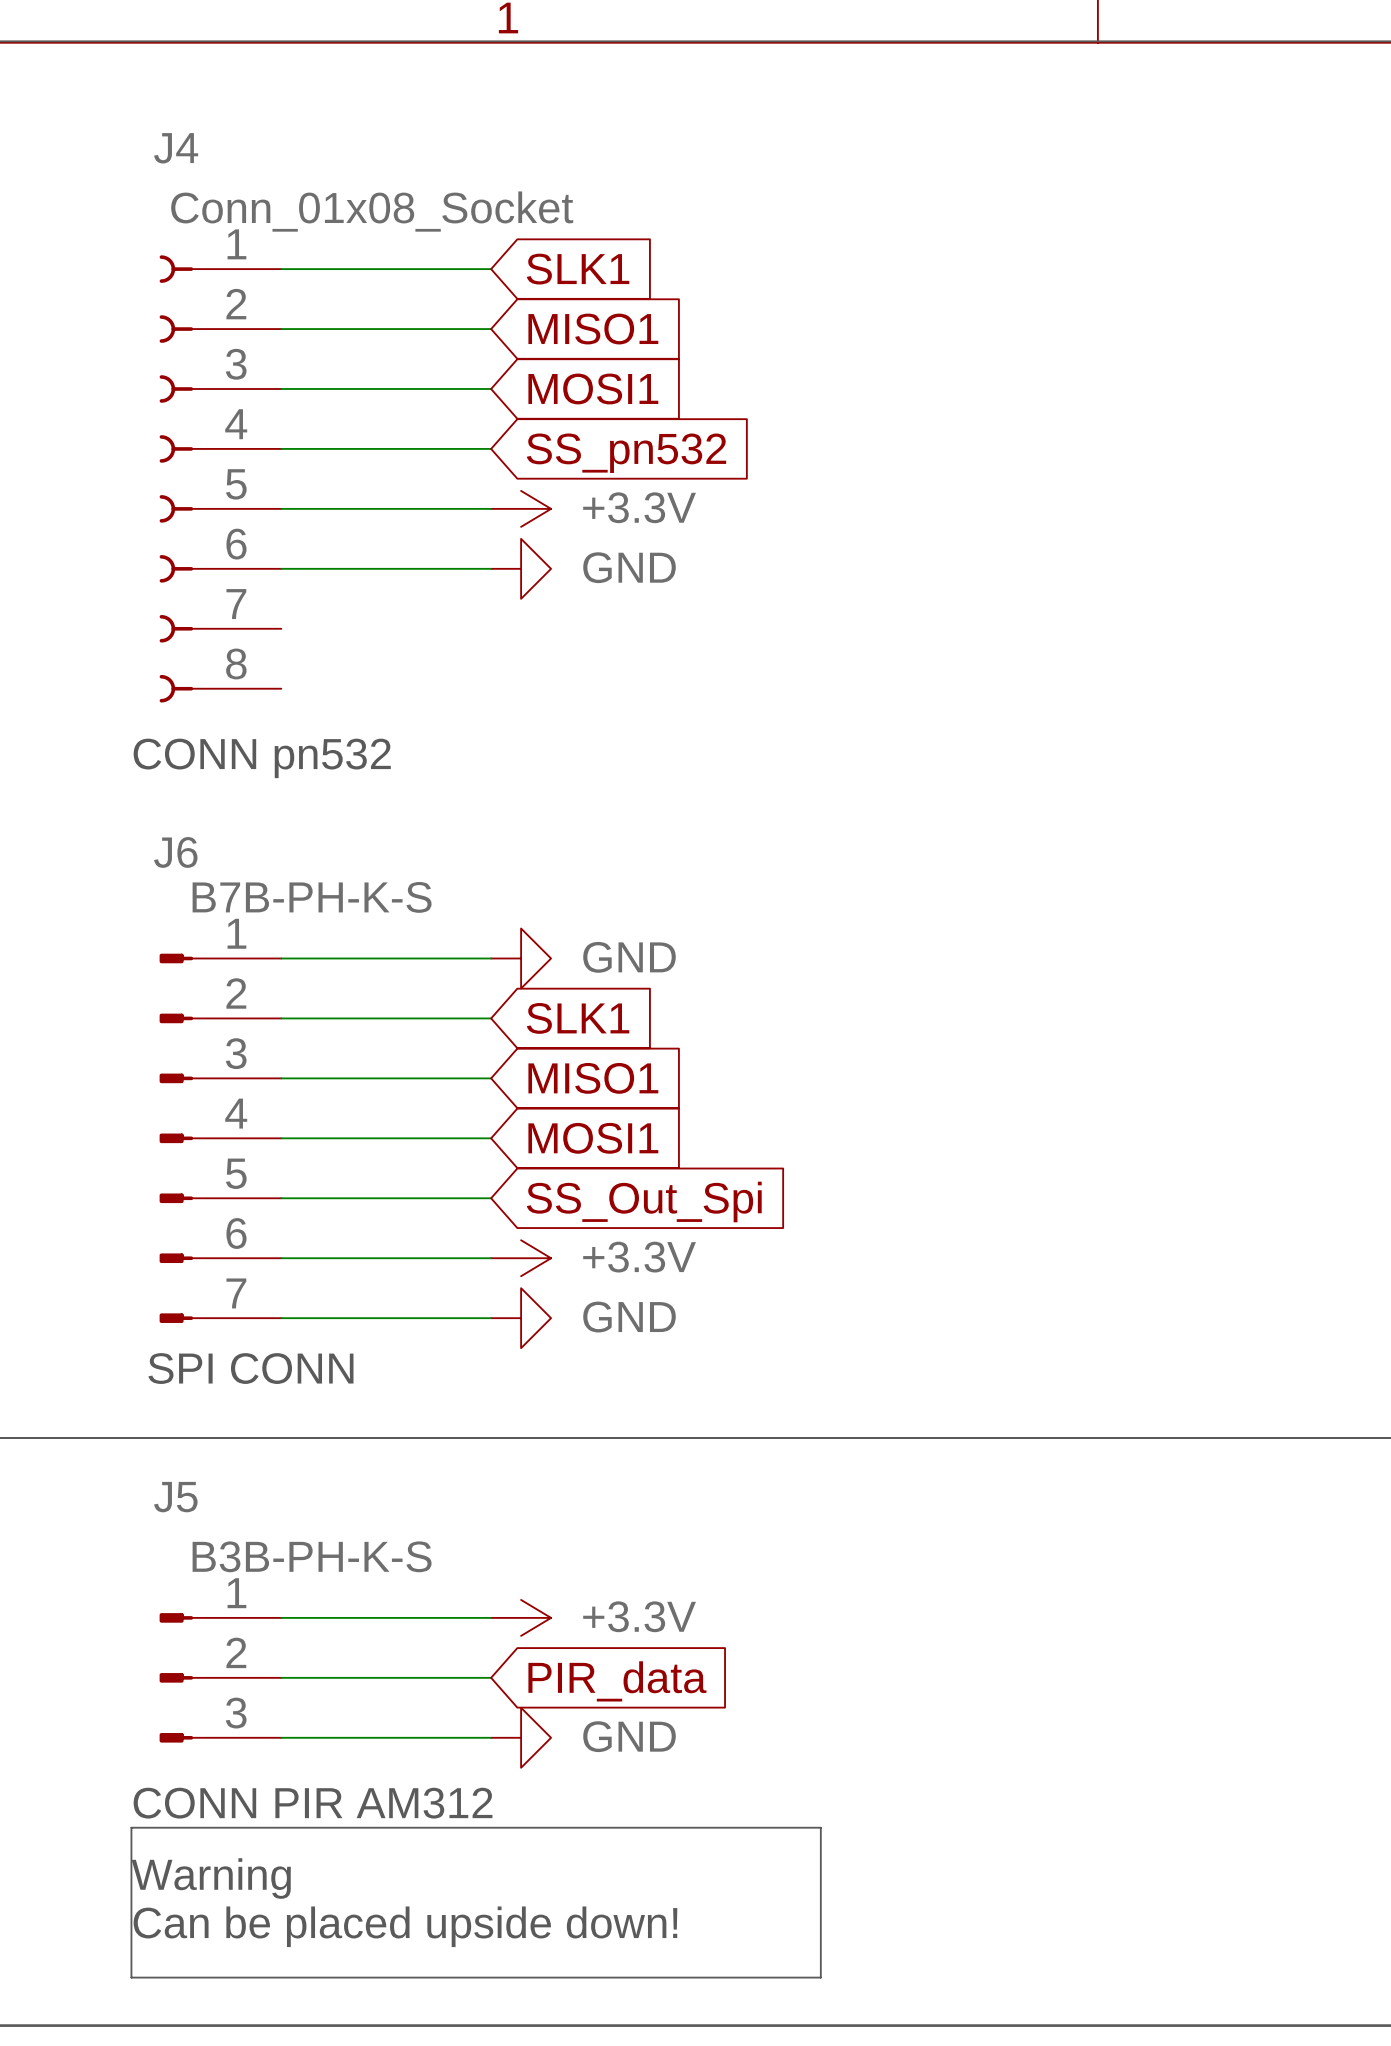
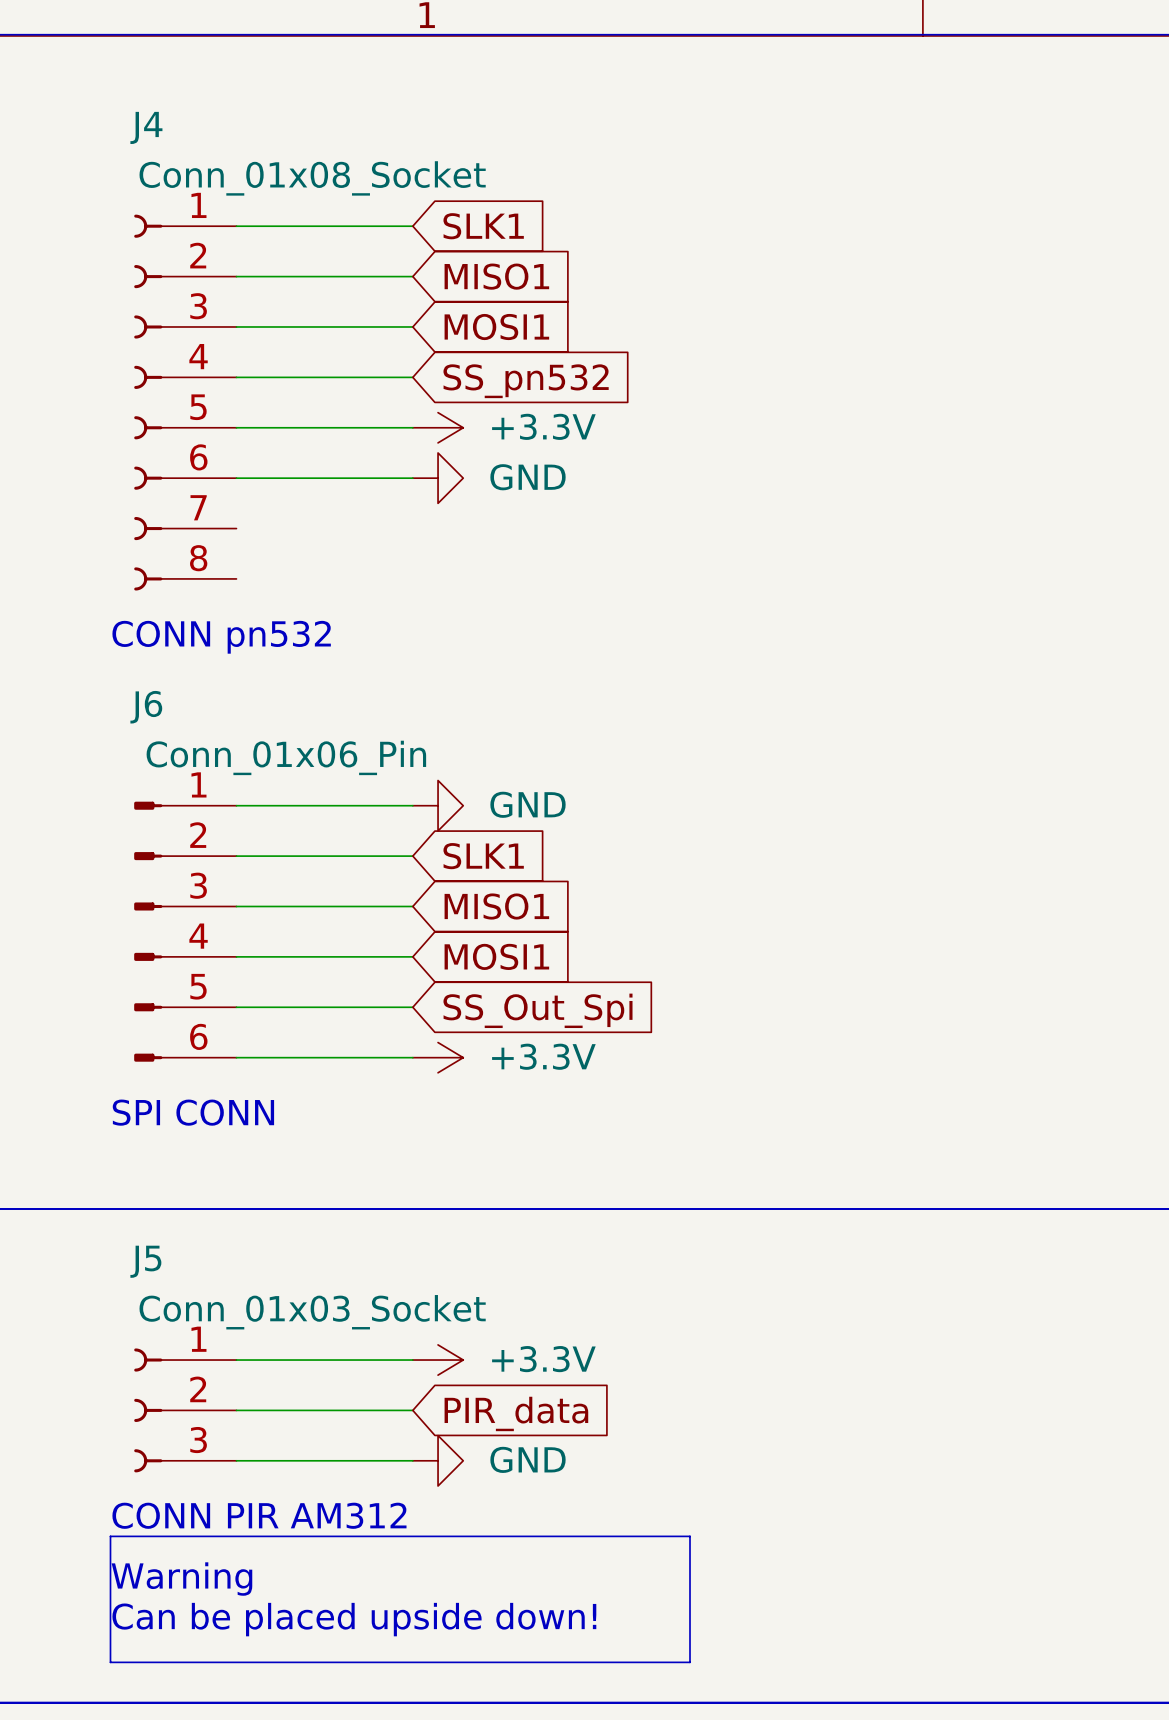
J6 value: B7B-PH-K-S (312, 897) -> Conn_01x06_Pin (286, 757)
J6 symbol: [159, 953, 282, 1323] -> [134, 801, 237, 1062]
wire: (281, 1318) (491, 1318) -> none
power symbol: GND (521, 1318) -> none
text position: SPI CONN (250, 1368) -> SPI CONN (193, 1112)
J5 value: B3B-PH-K-S (312, 1556) -> Conn_01x03_Socket (312, 1312)
J5 symbol: [159, 1613, 282, 1743] -> [134, 1348, 237, 1473]

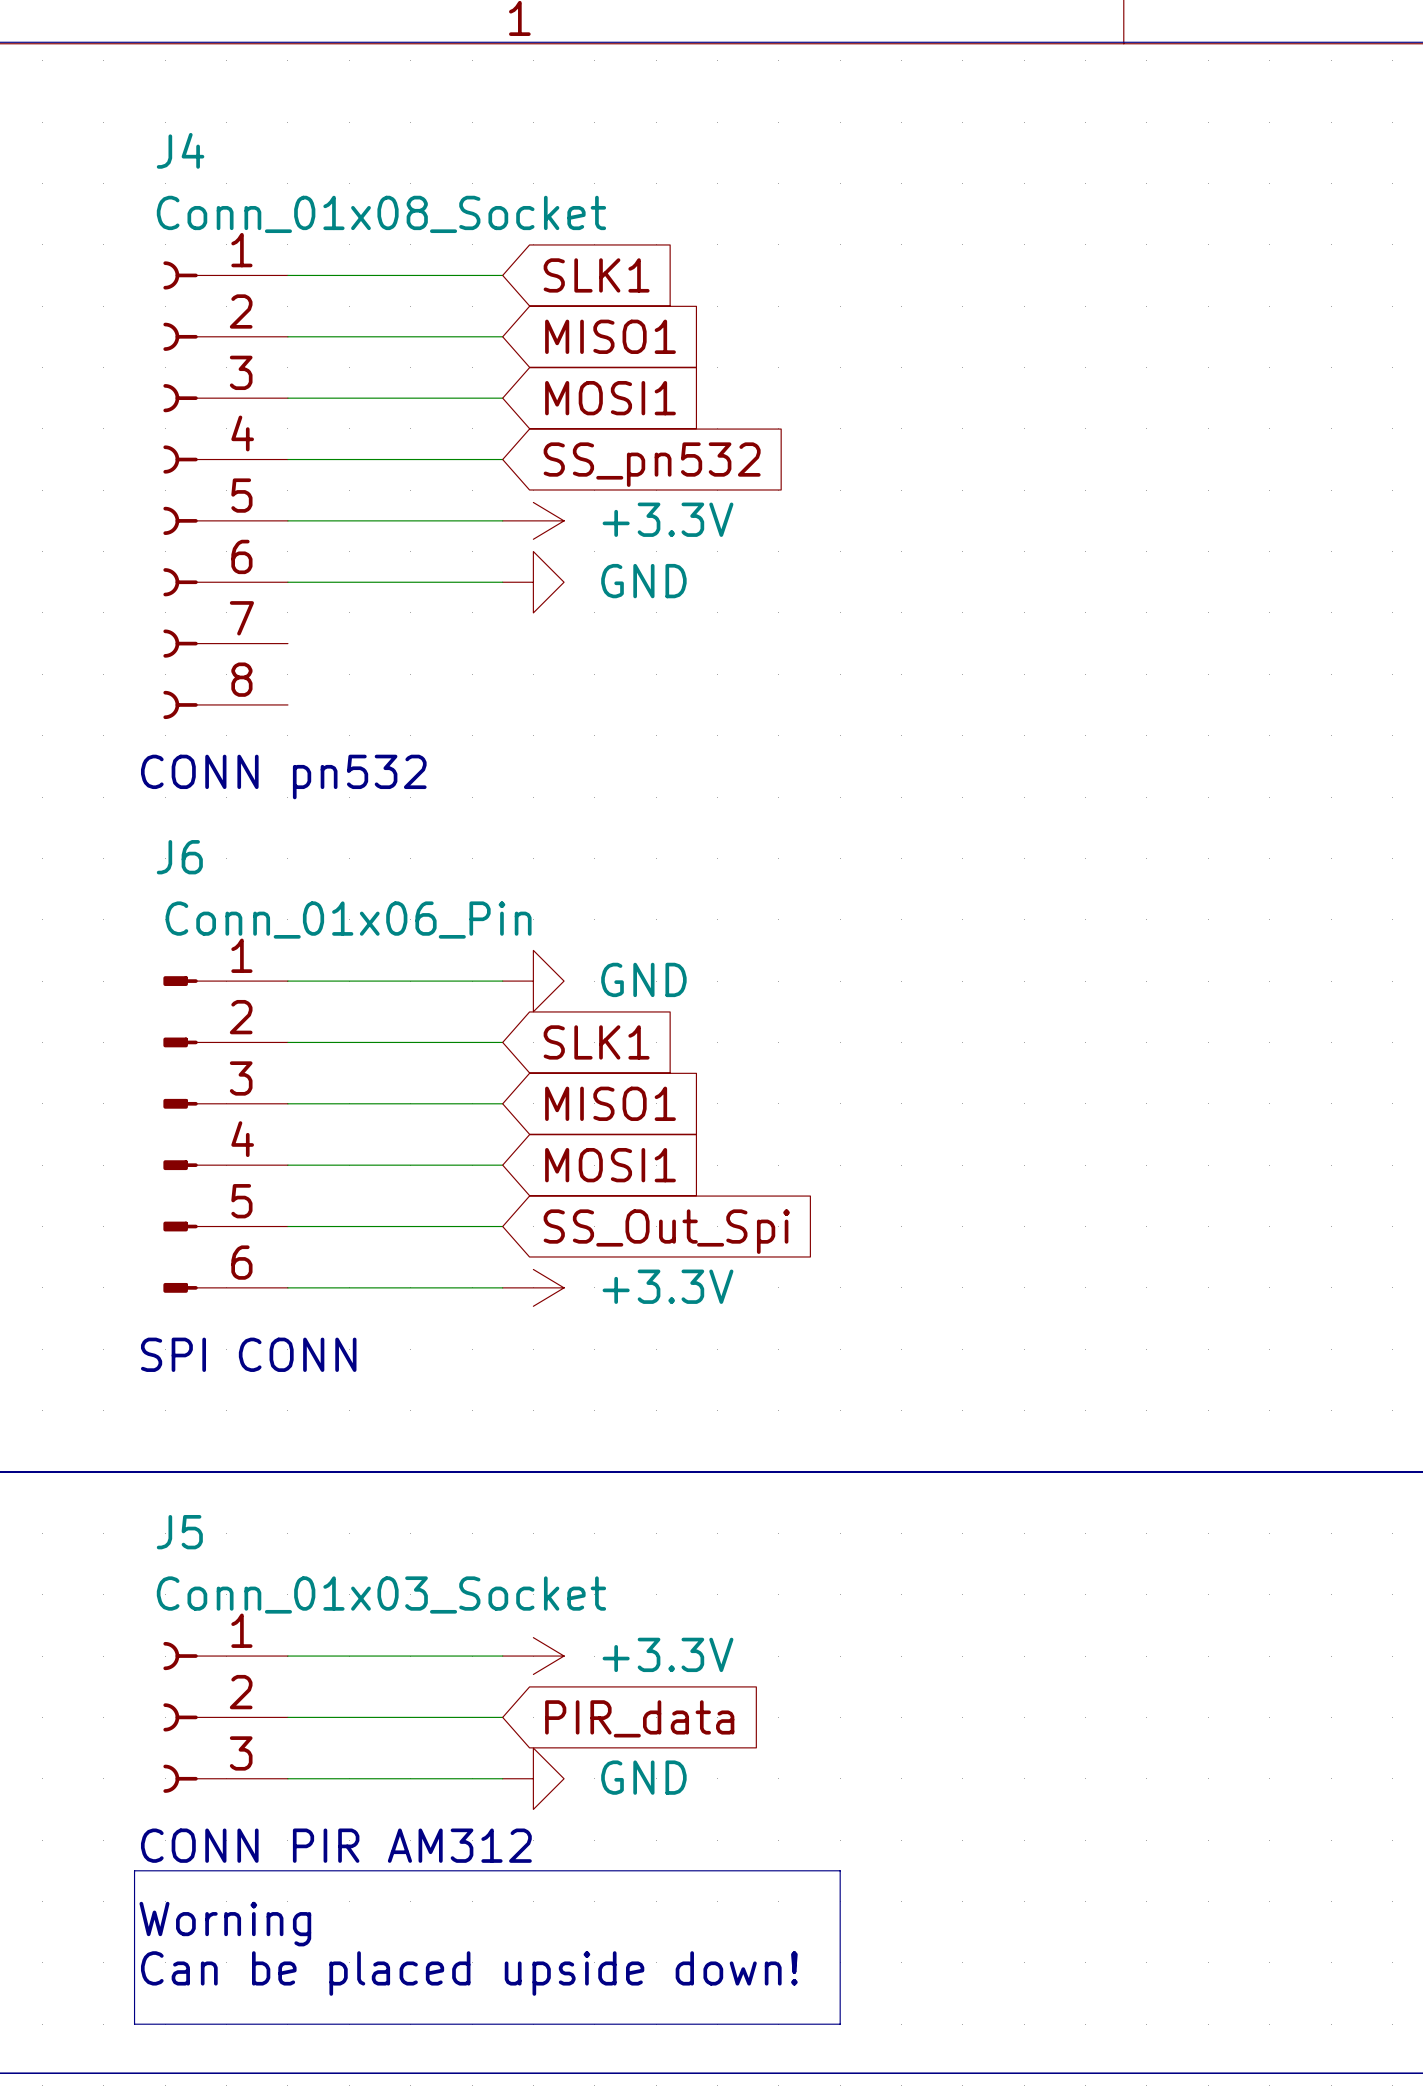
text: Warning (181, 1579) -> Worning (225, 1924)

